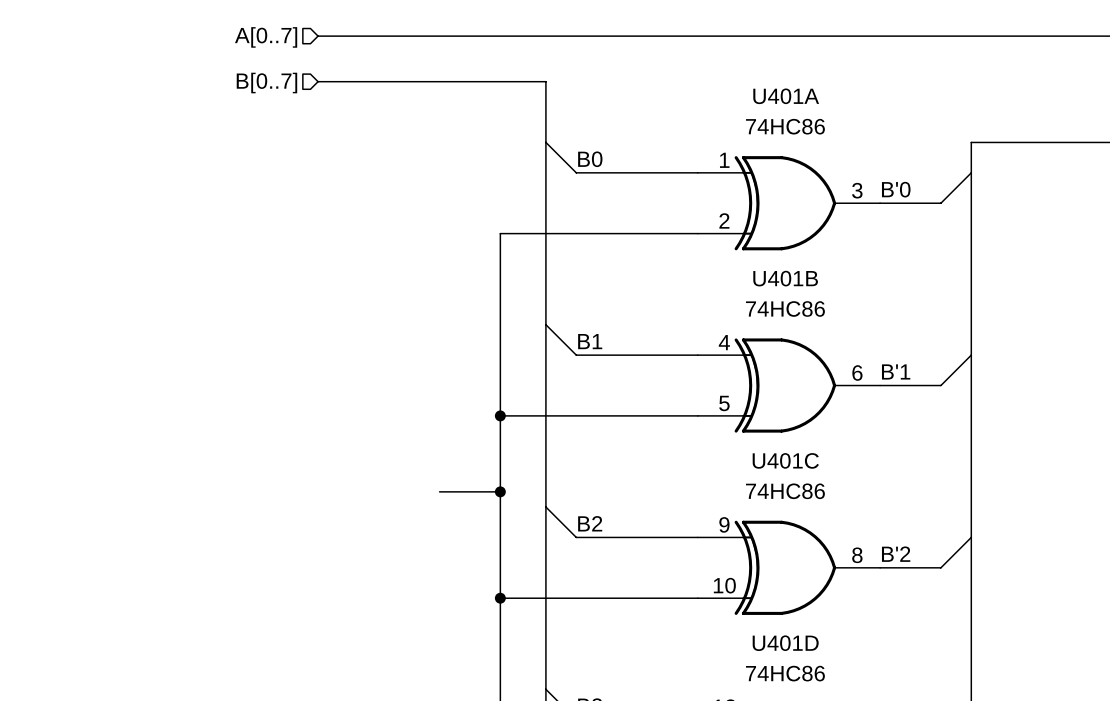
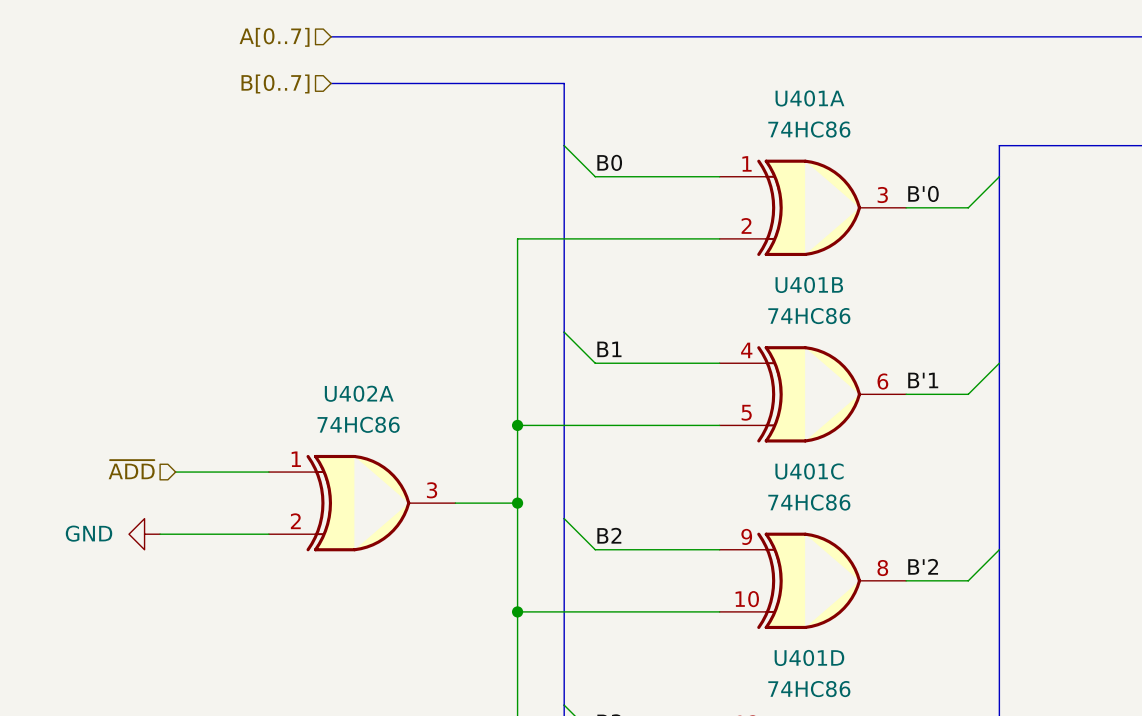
hierarchical label: none -> ~{ADD} (131, 469)
wire: none -> (175, 472) (268, 472)
U402A: none -> 74HC86 (362, 503)
power symbol: none -> GND (144, 534)
wire: none -> (160, 534) (268, 534)

